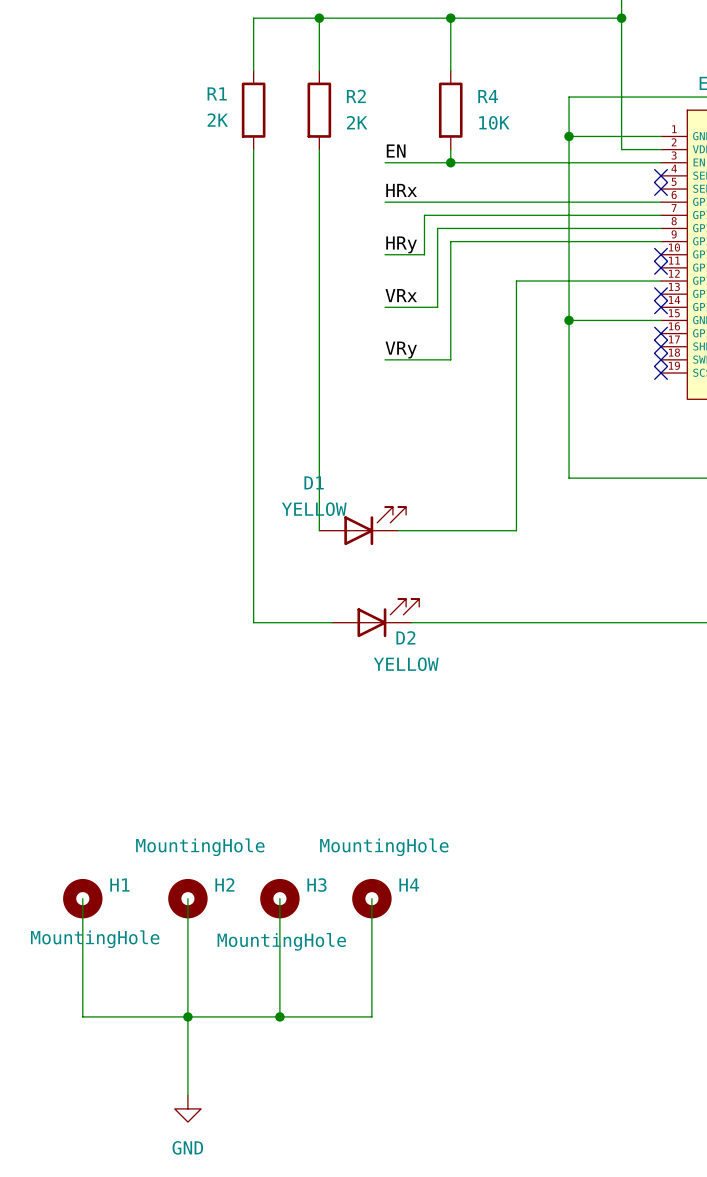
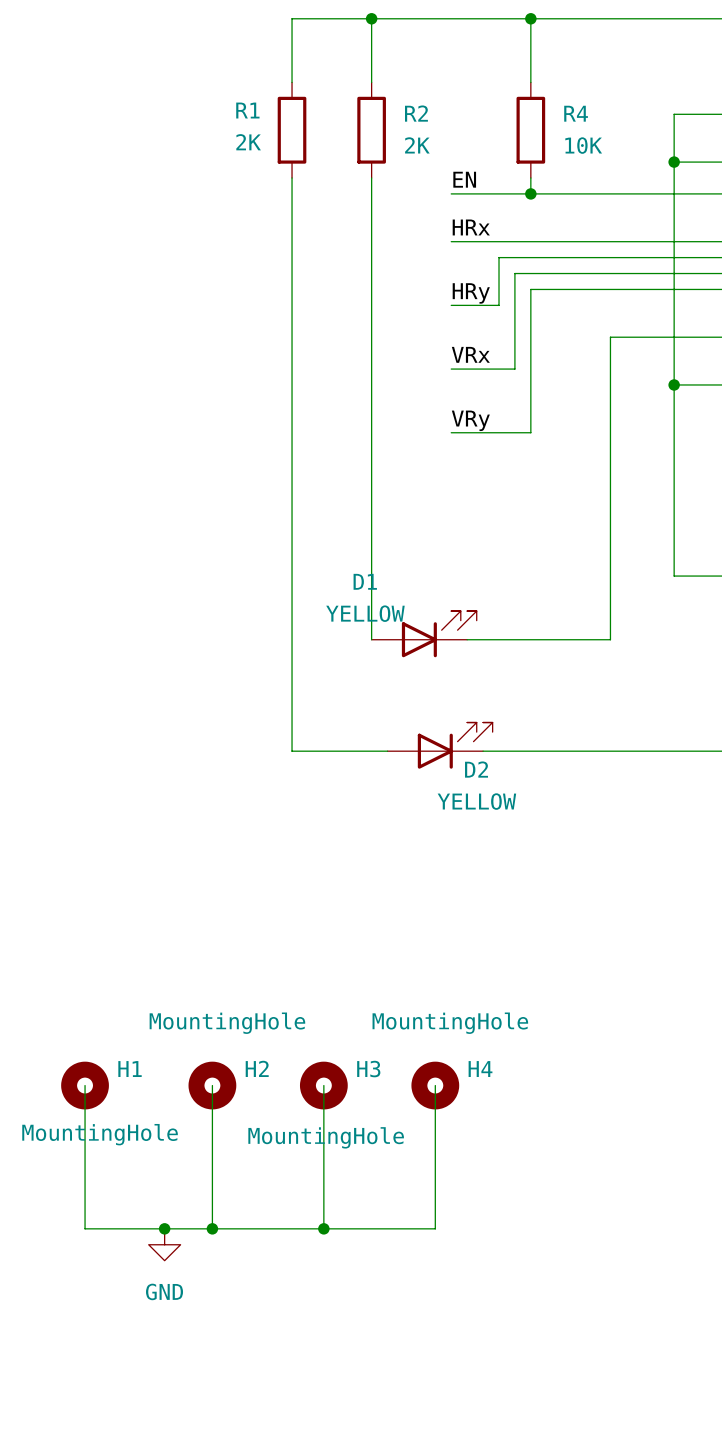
junction: none -> (164, 1228)
wire: (187, 1016) (187, 1095) -> none
power symbol position: GND (187, 1108) -> GND (164, 1244)

